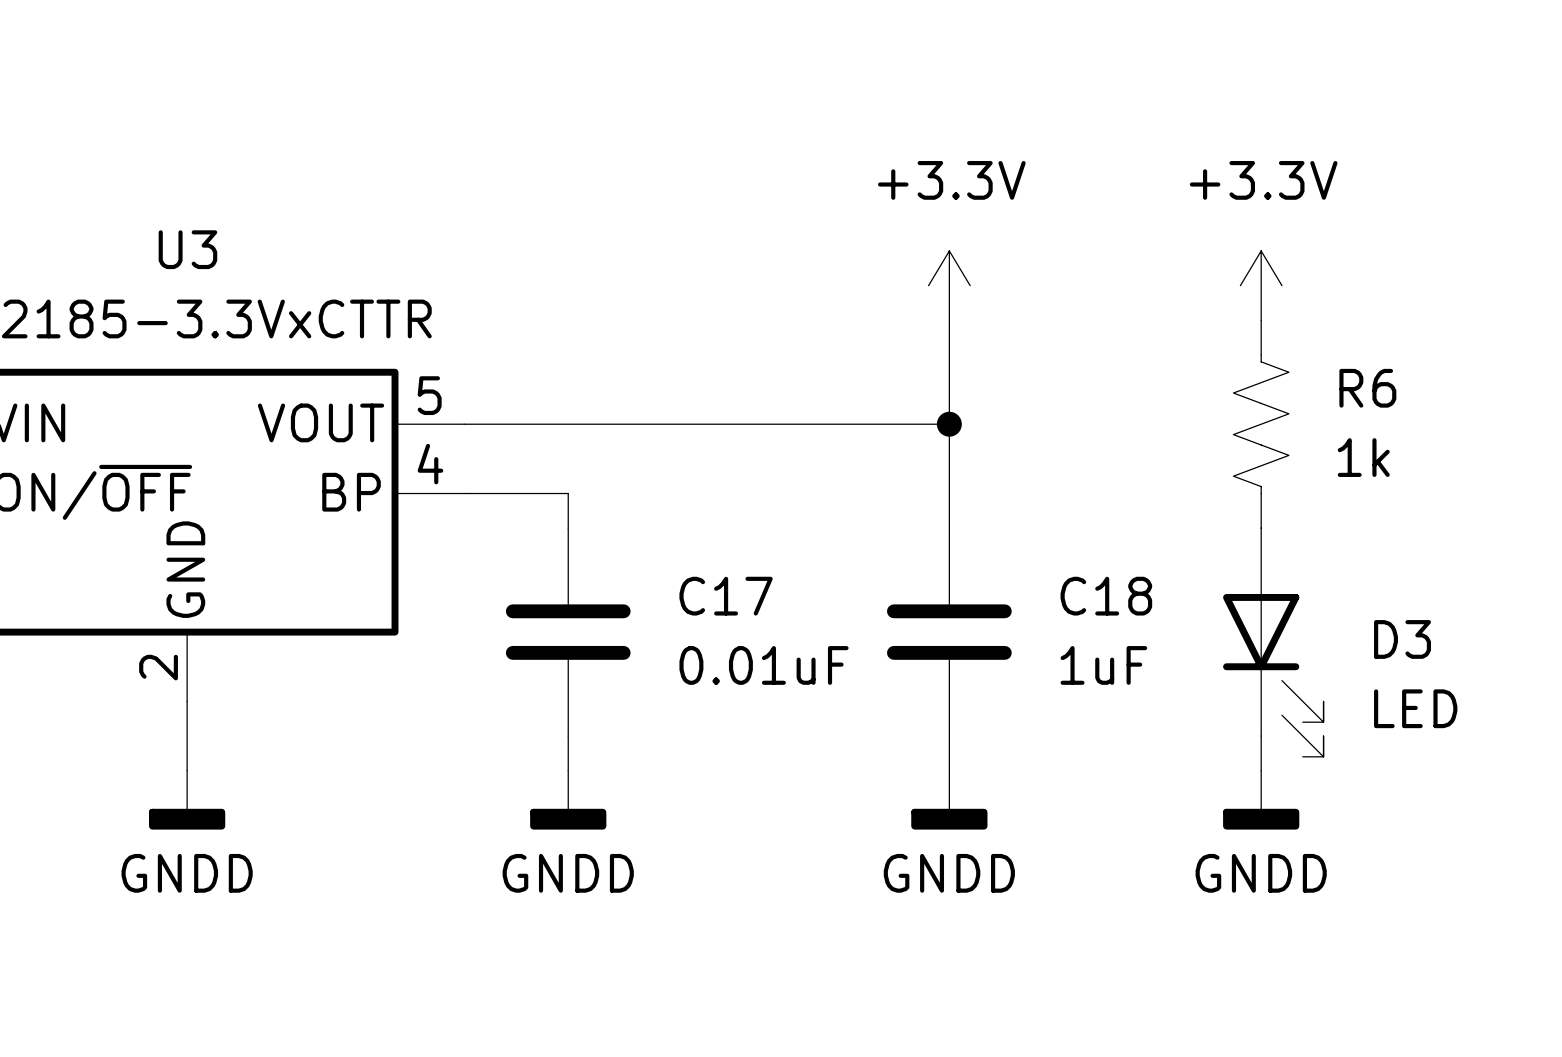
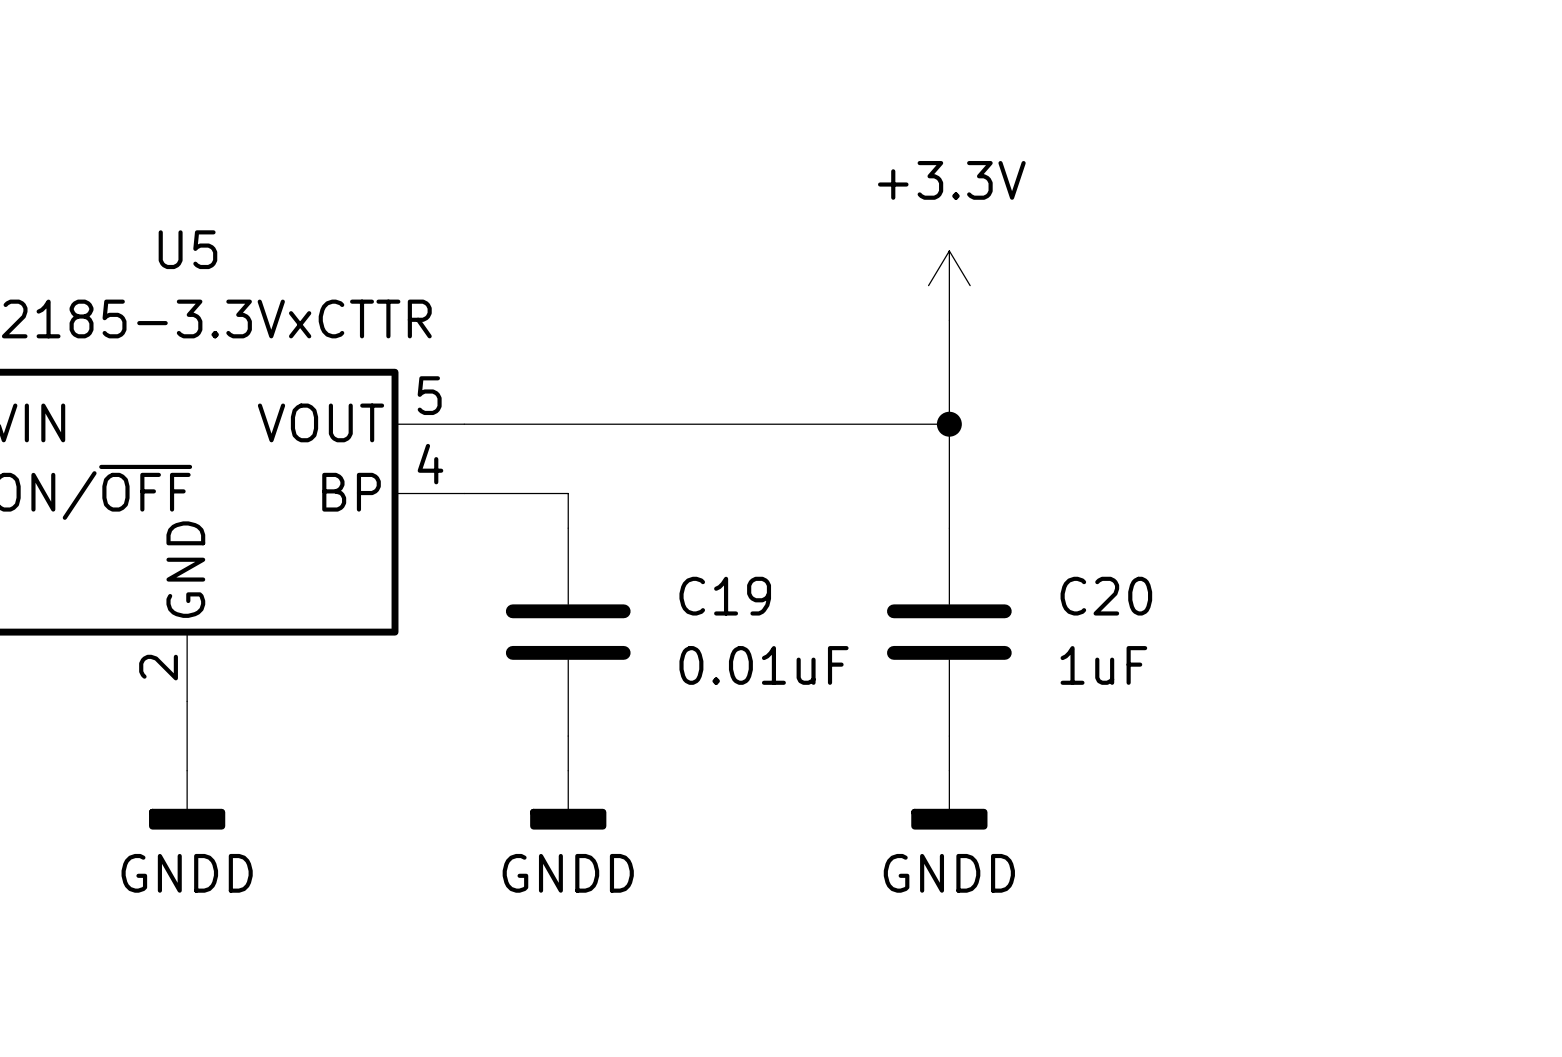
U3 name: U3 (187, 249) -> U5 (187, 249)
power symbol: +3.3V (1261, 285) -> none
R6: 1k (1261, 424) -> none
C17 name: C17 (726, 596) -> C19 (725, 596)
C18 name: C18 (1106, 596) -> C20 (1106, 596)
D3: LED (1273, 642) -> none
wire: (1261, 736) (1261, 770) -> none
power symbol: GNDD (1261, 800) -> none

